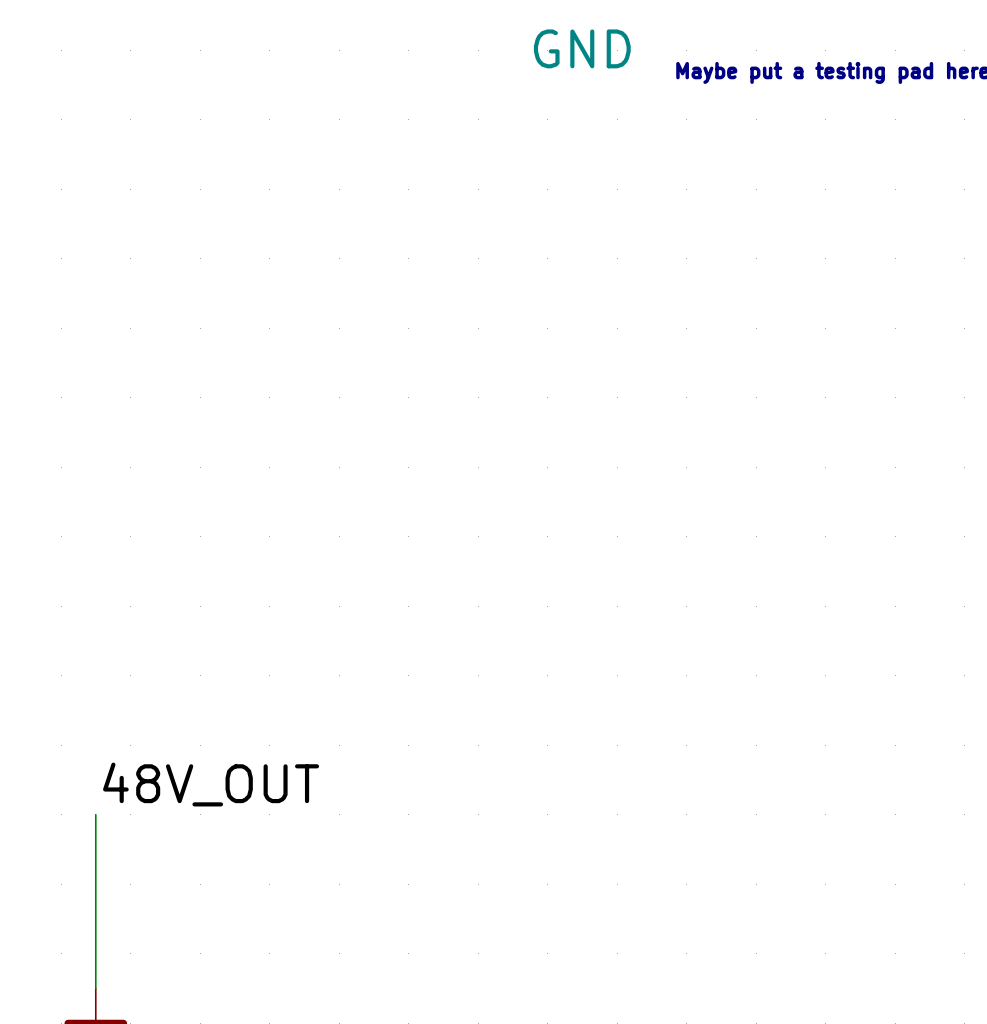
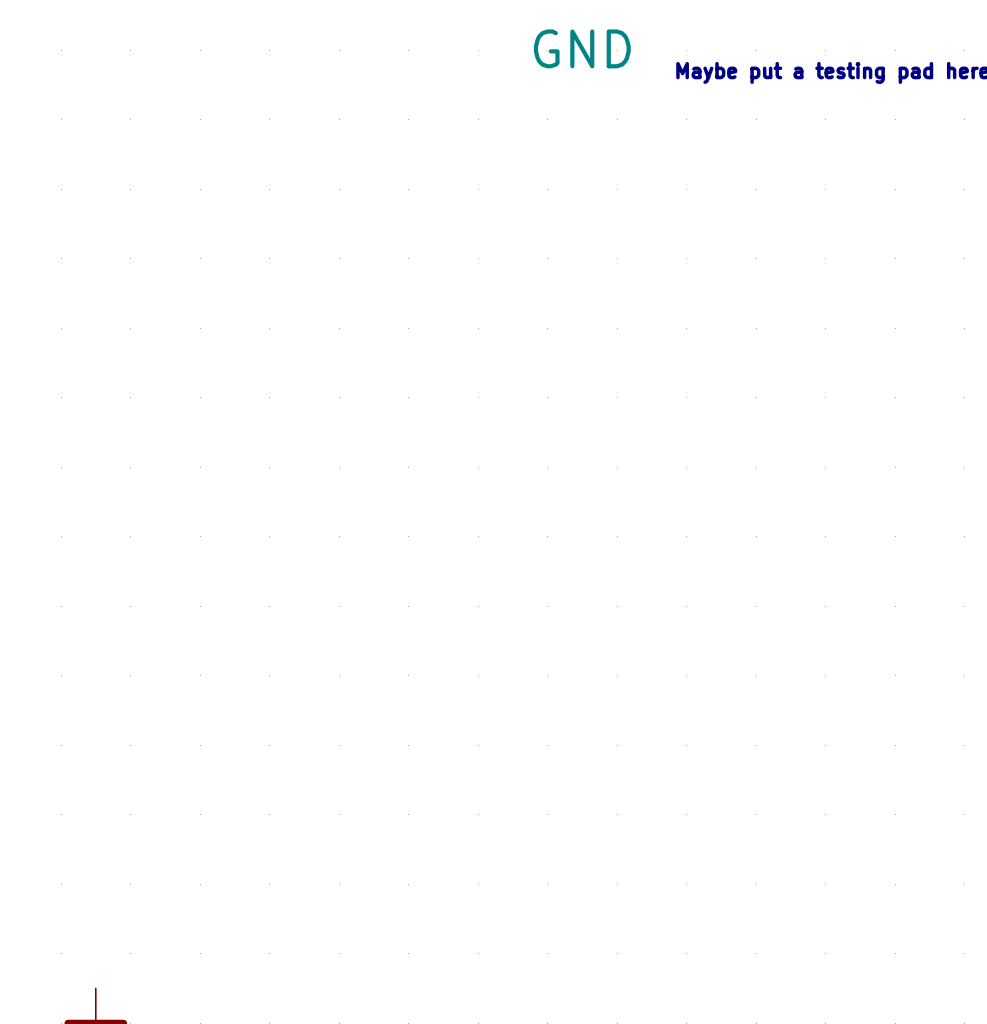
label: 48V_OUT (211, 784) -> none
wire: (95, 814) (95, 988) -> none

